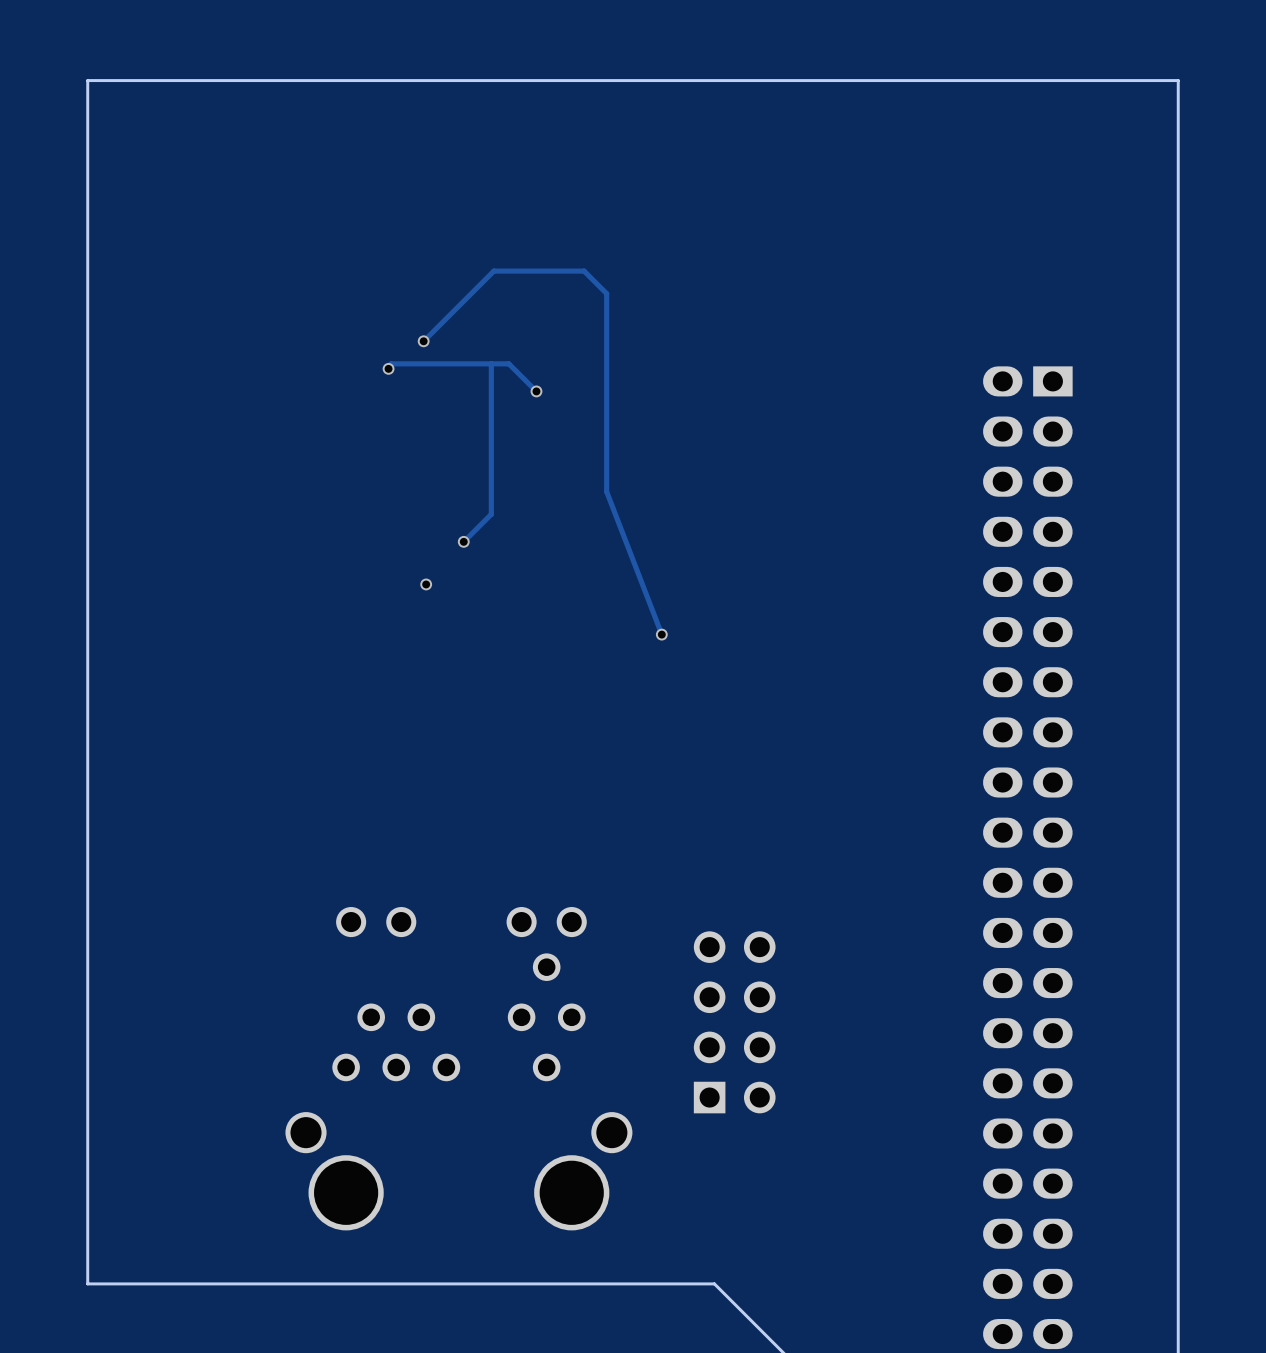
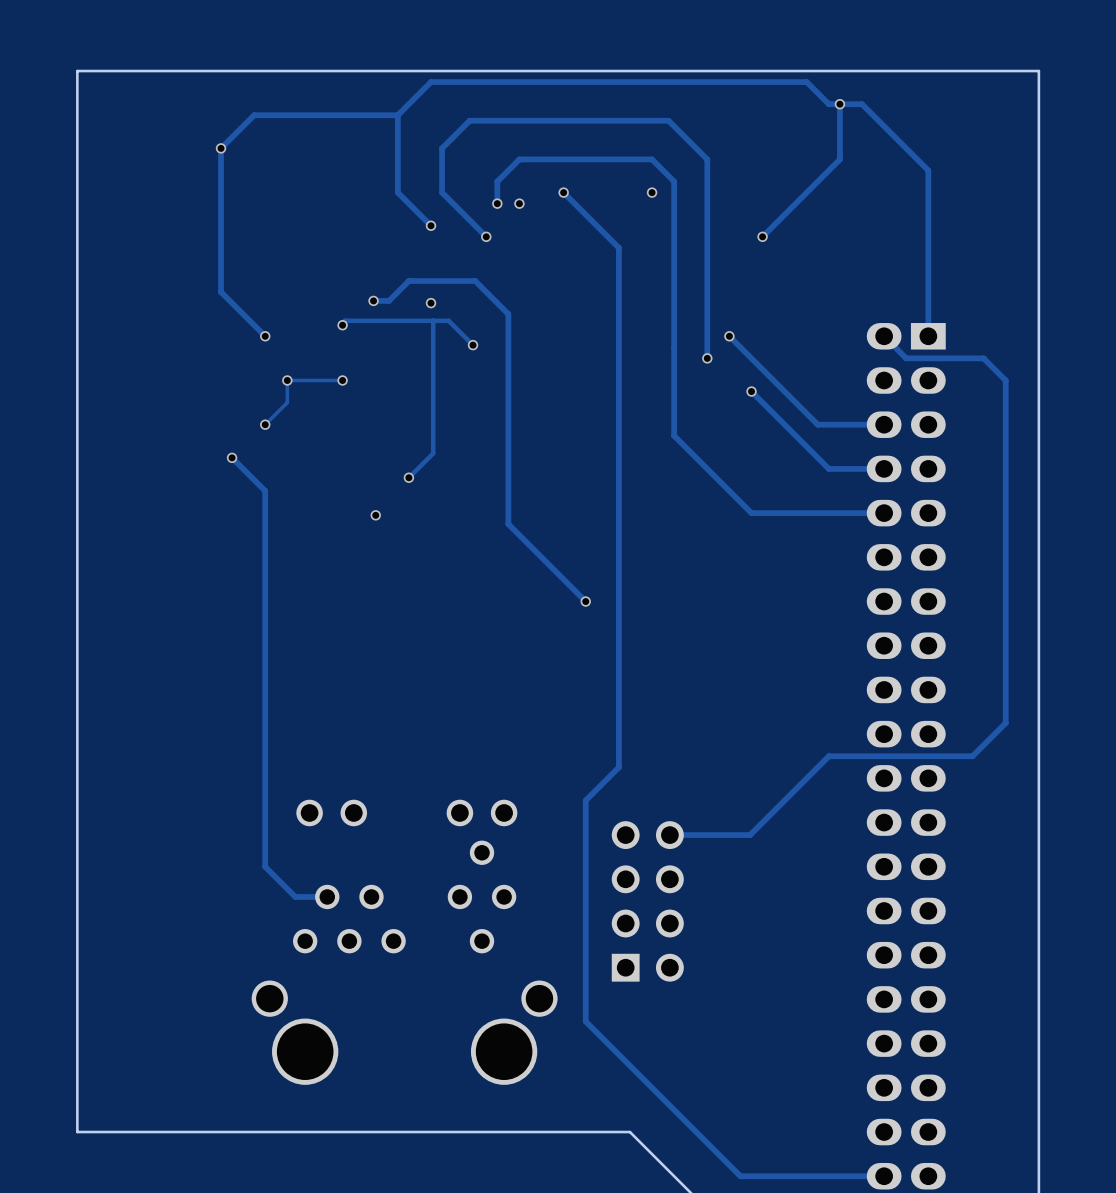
track: none -> (839, 104) (839, 159) (762, 236)
via: none -> (839, 104)
track: none -> (397, 115) (397, 192) (431, 225)
track: none -> (397, 115) (254, 115) (221, 148) (221, 292) (265, 336)
track: none -> (397, 115) (431, 82) (806, 82) (828, 104) (862, 104) (928, 170) (928, 336)
via: none -> (221, 148)
track: none -> (563, 192) (618, 247) (618, 767) (585, 800) (585, 1021) (740, 1176) (884, 1176)
via: none -> (563, 192)
via: none -> (652, 192)
track: none -> (497, 203) (497, 181) (519, 159) (652, 159) (674, 181) (674, 435) (751, 513) (884, 513)
via: none -> (497, 203)
via: none -> (519, 203)
via: none -> (431, 225)
track: none -> (486, 236) (442, 192) (442, 148) (469, 120) (668, 120) (707, 159) (707, 358)
via: none -> (486, 236)
via: none -> (762, 236)
track: (423, 341) (493, 271) (584, 271) (606, 293) (606, 491) (661, 634) -> (373, 300) (389, 300) (408, 281) (475, 281) (508, 314) (508, 524) (585, 601)
via: none -> (431, 303)
via: none -> (265, 336)
track: none -> (729, 336) (817, 424) (884, 424)
via: none -> (729, 336)
track: none -> (884, 336) (906, 358) (983, 358) (1005, 380) (1005, 723) (972, 756) (828, 756) (750, 835) (669, 835)
via: none -> (707, 358)
via: none -> (287, 380)
track: none -> (342, 380) (287, 380) (287, 402) (265, 424)
via: none -> (342, 380)
track: none -> (751, 391) (828, 468) (884, 468)
via: none -> (751, 391)
via: none -> (265, 424)
track: none -> (232, 457) (265, 491) (265, 866) (295, 896) (327, 896)
via: none -> (232, 457)
via position: (661, 634) -> (585, 601)

